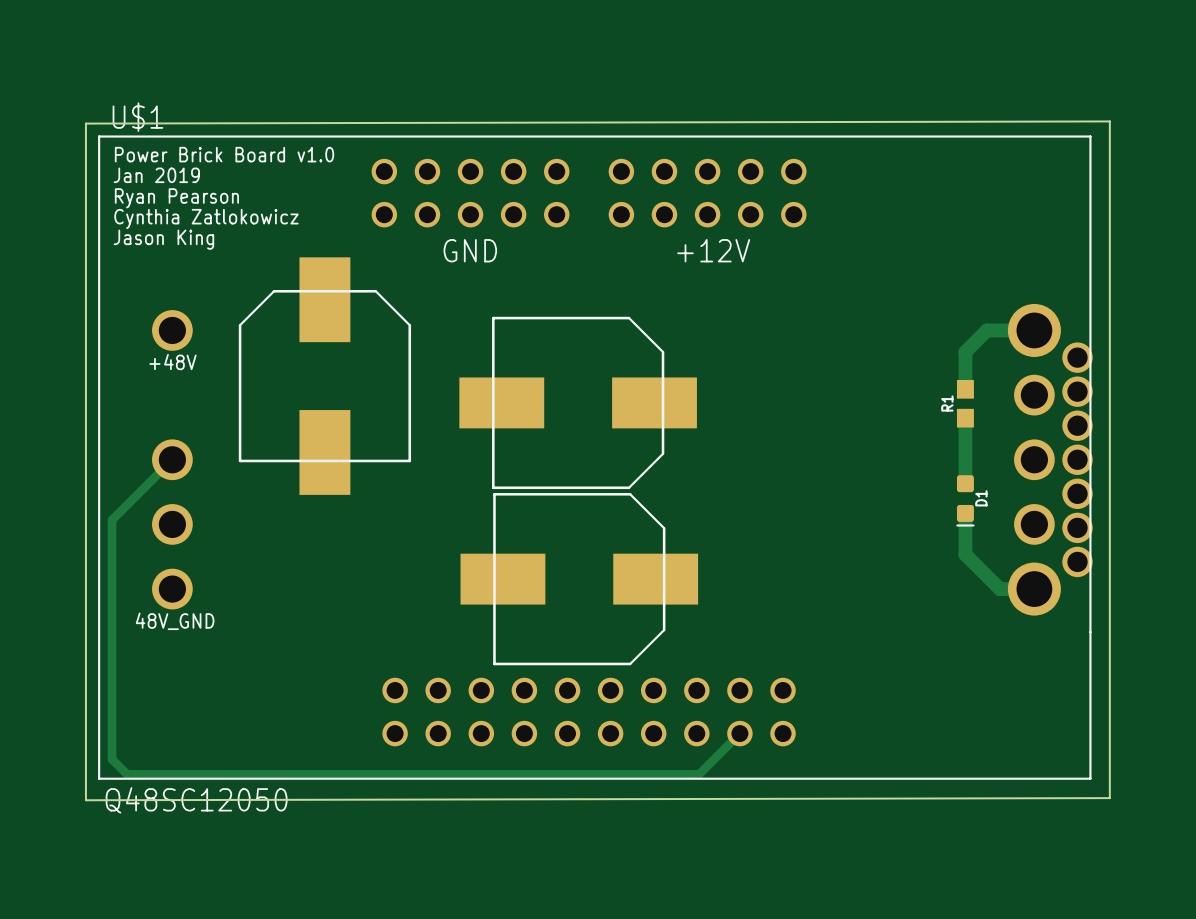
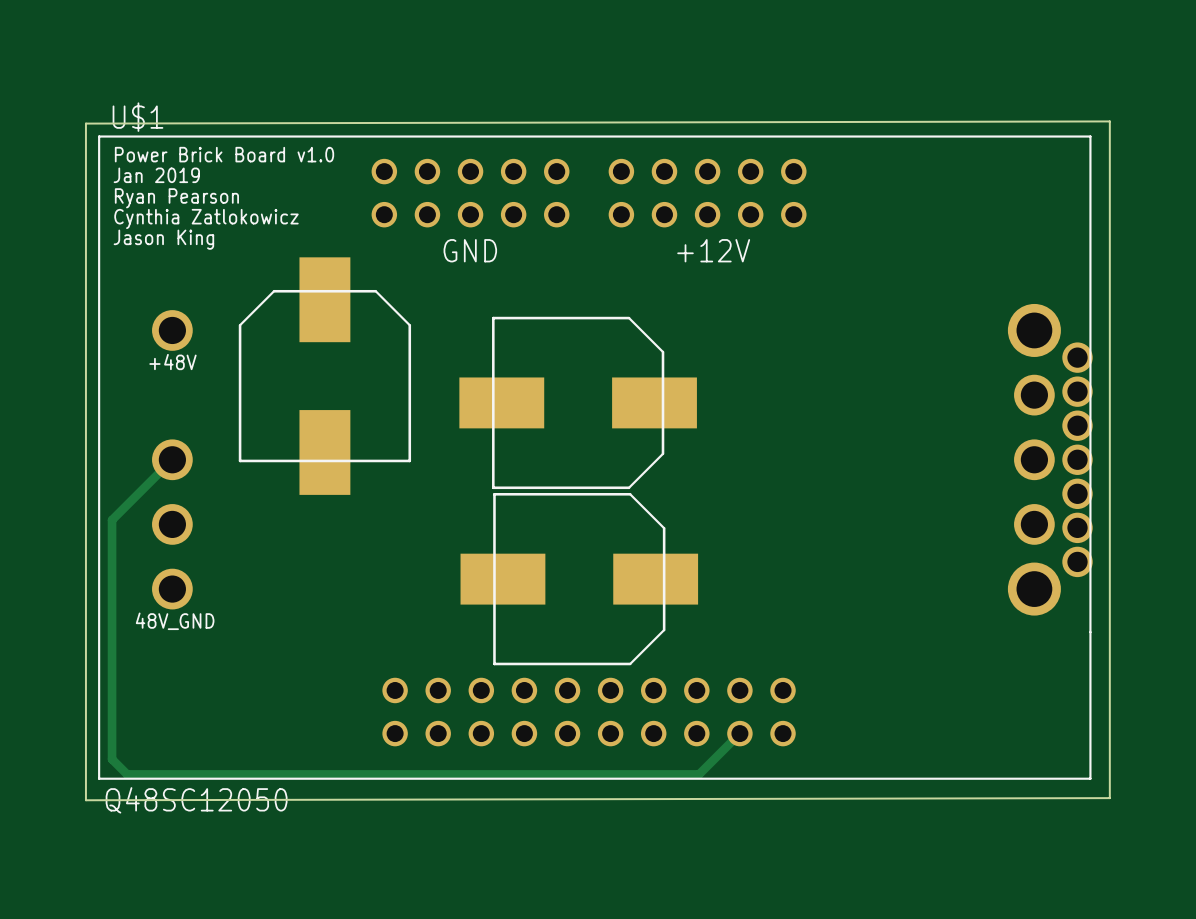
track: (1034, 330) (987, 330) (965, 352) (965, 389) -> none
R1: (965, 403) -> none
track: (965, 418) (965, 483) -> none
D1: (965, 500) -> none
track: (965, 513) (965, 554) (999, 589) (1034, 589) -> none

